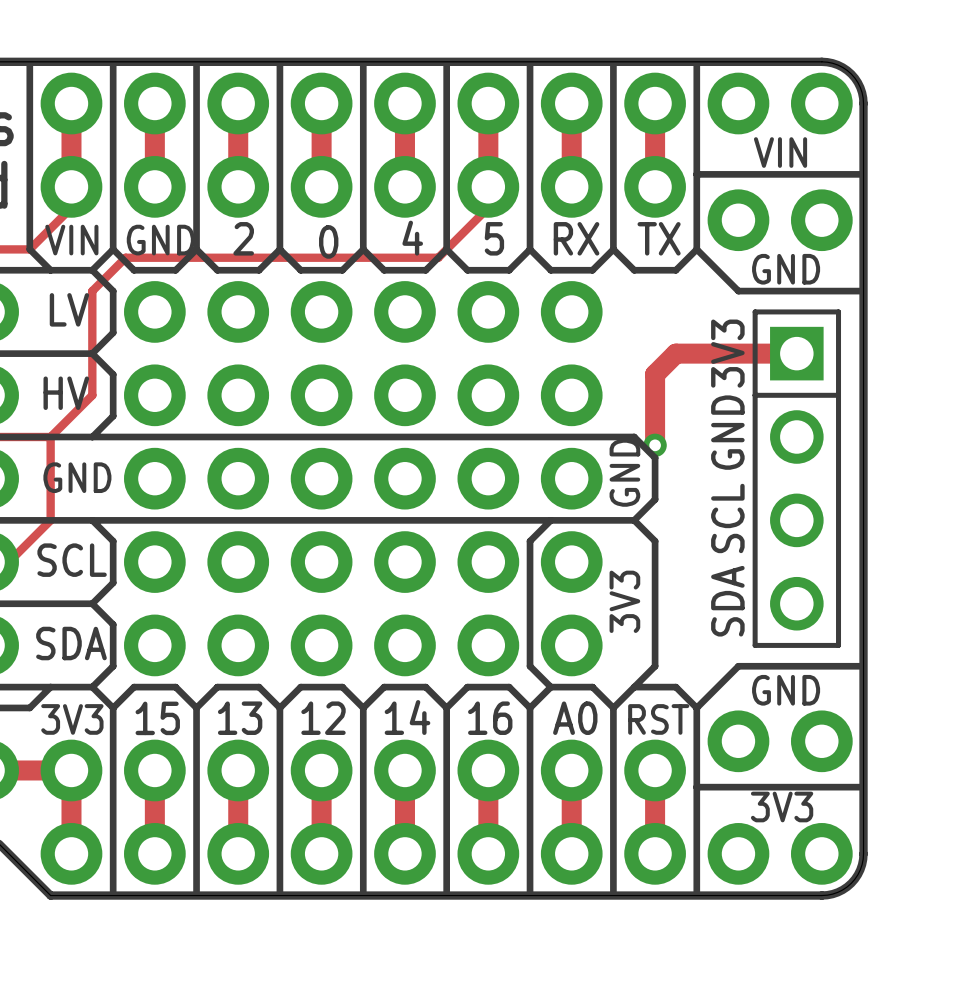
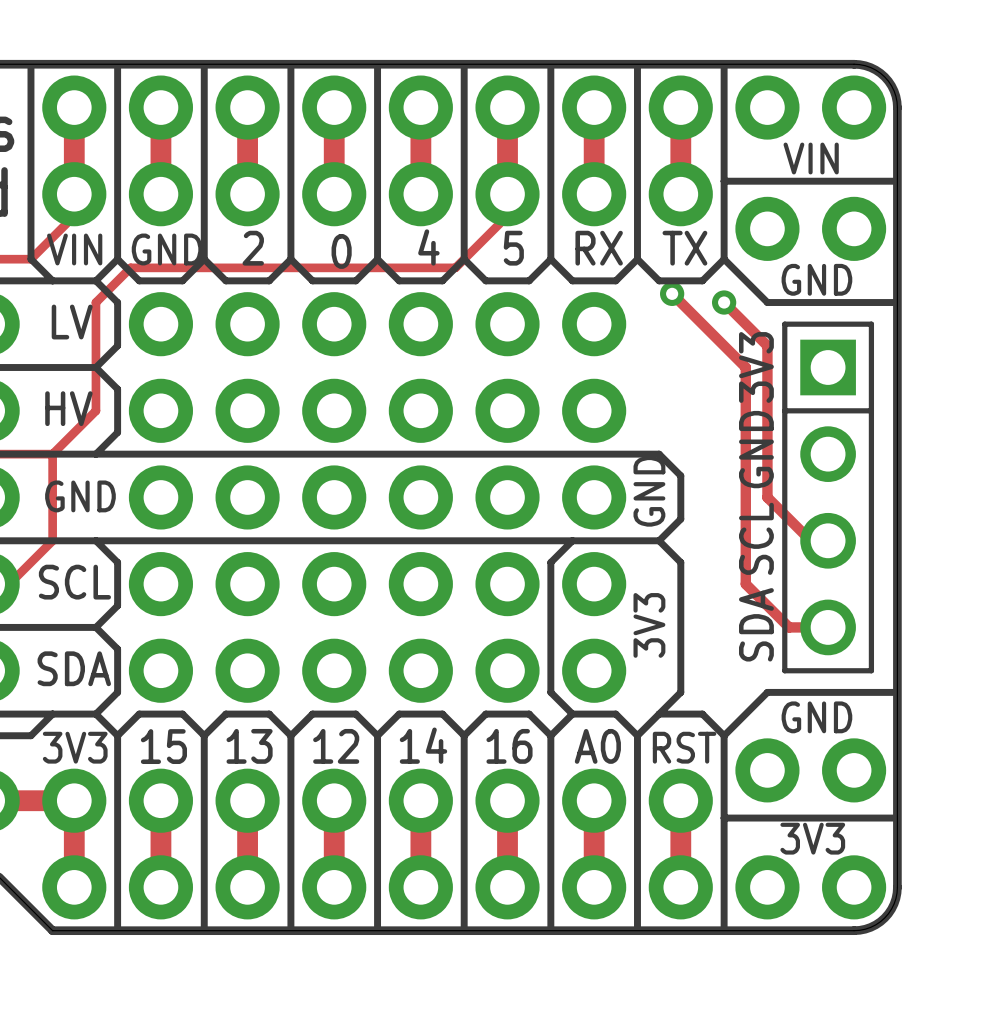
track: none -> (672, 293) (745, 367) (745, 584) (789, 627) (828, 627)
via: none -> (672, 293)
track: none -> (724, 302) (767, 345) (767, 497) (810, 540) (828, 540)
via: none -> (724, 302)
track: (796, 353) (675, 353) (655, 374) (655, 445) -> none
via: (655, 445) -> none

